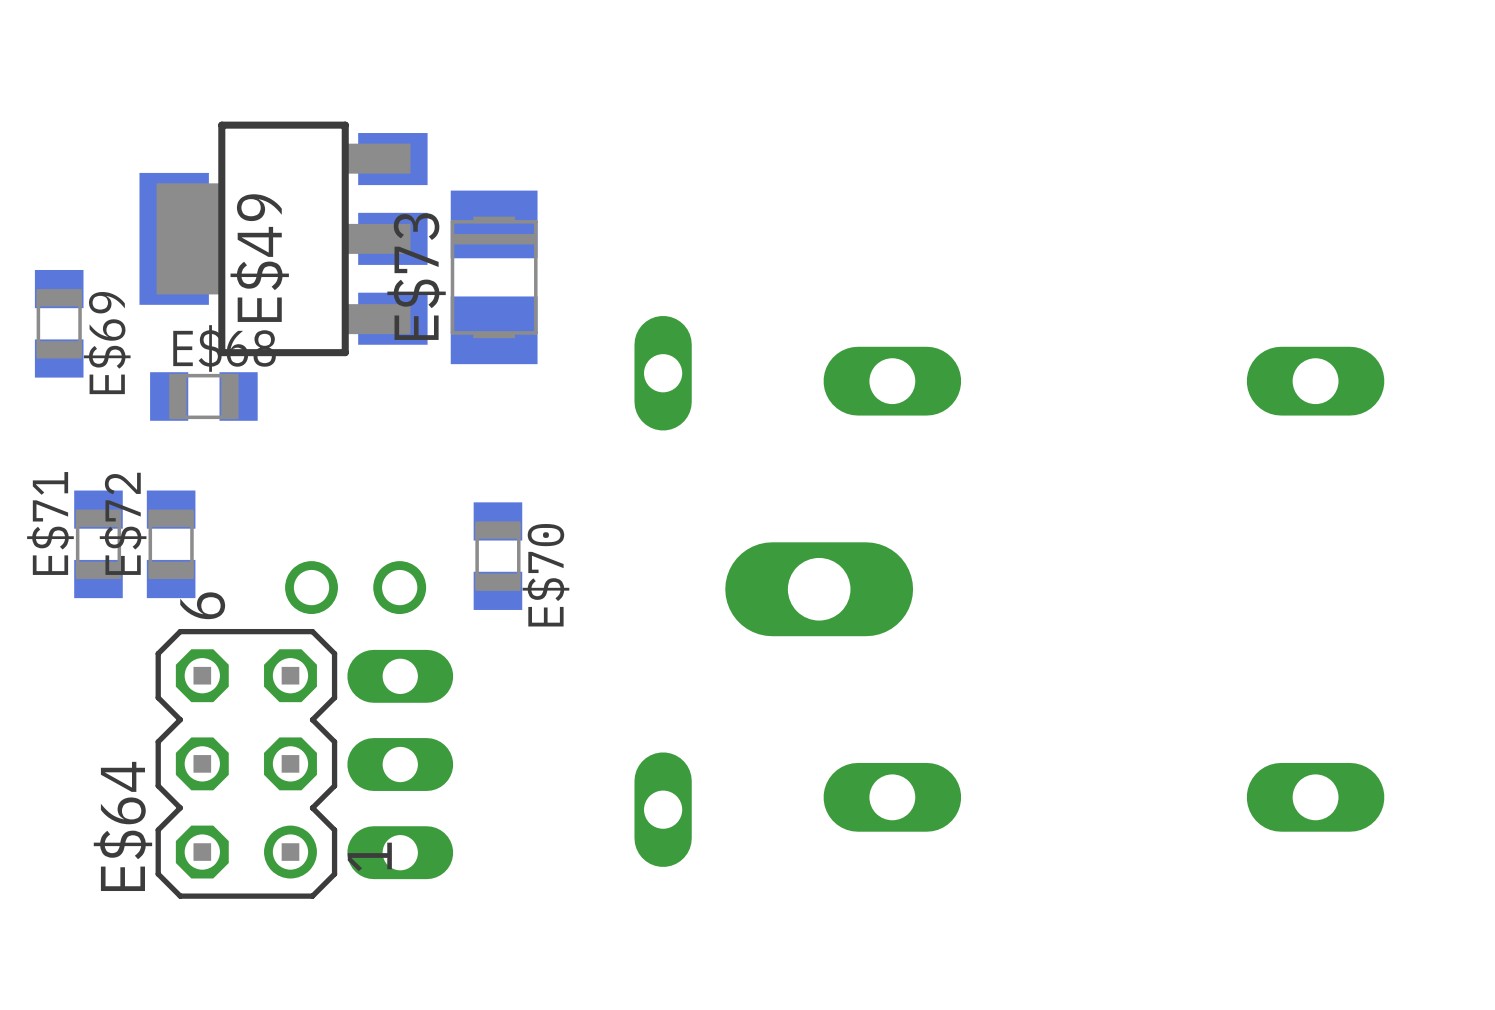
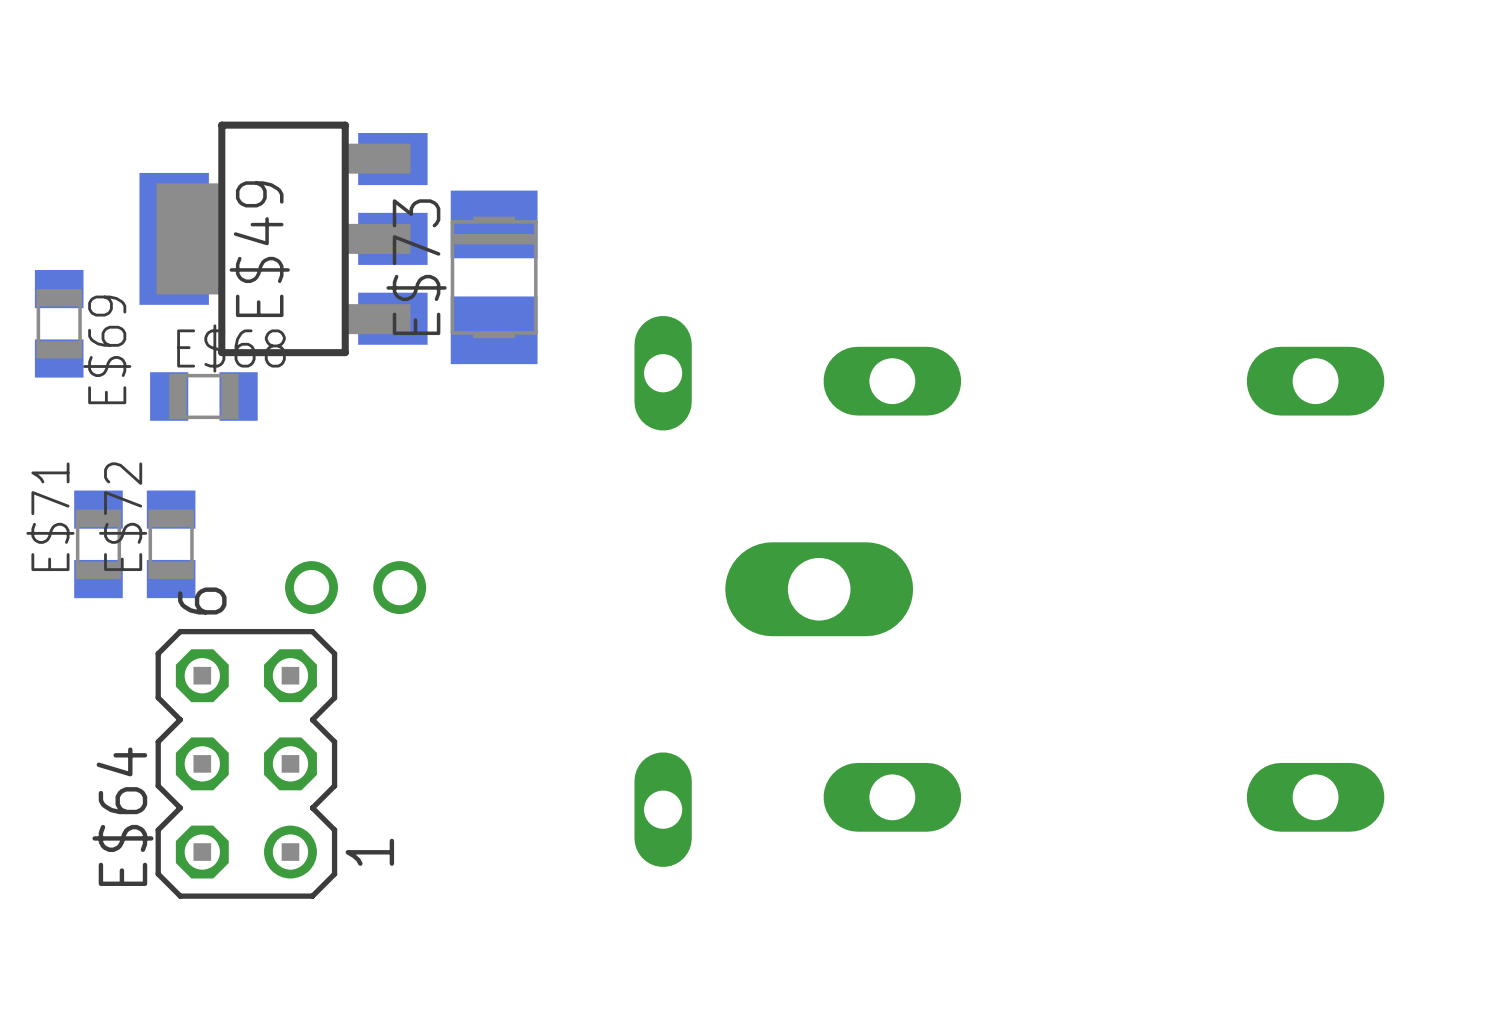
E$70: (497, 556) -> none
part: (400, 764) -> none

